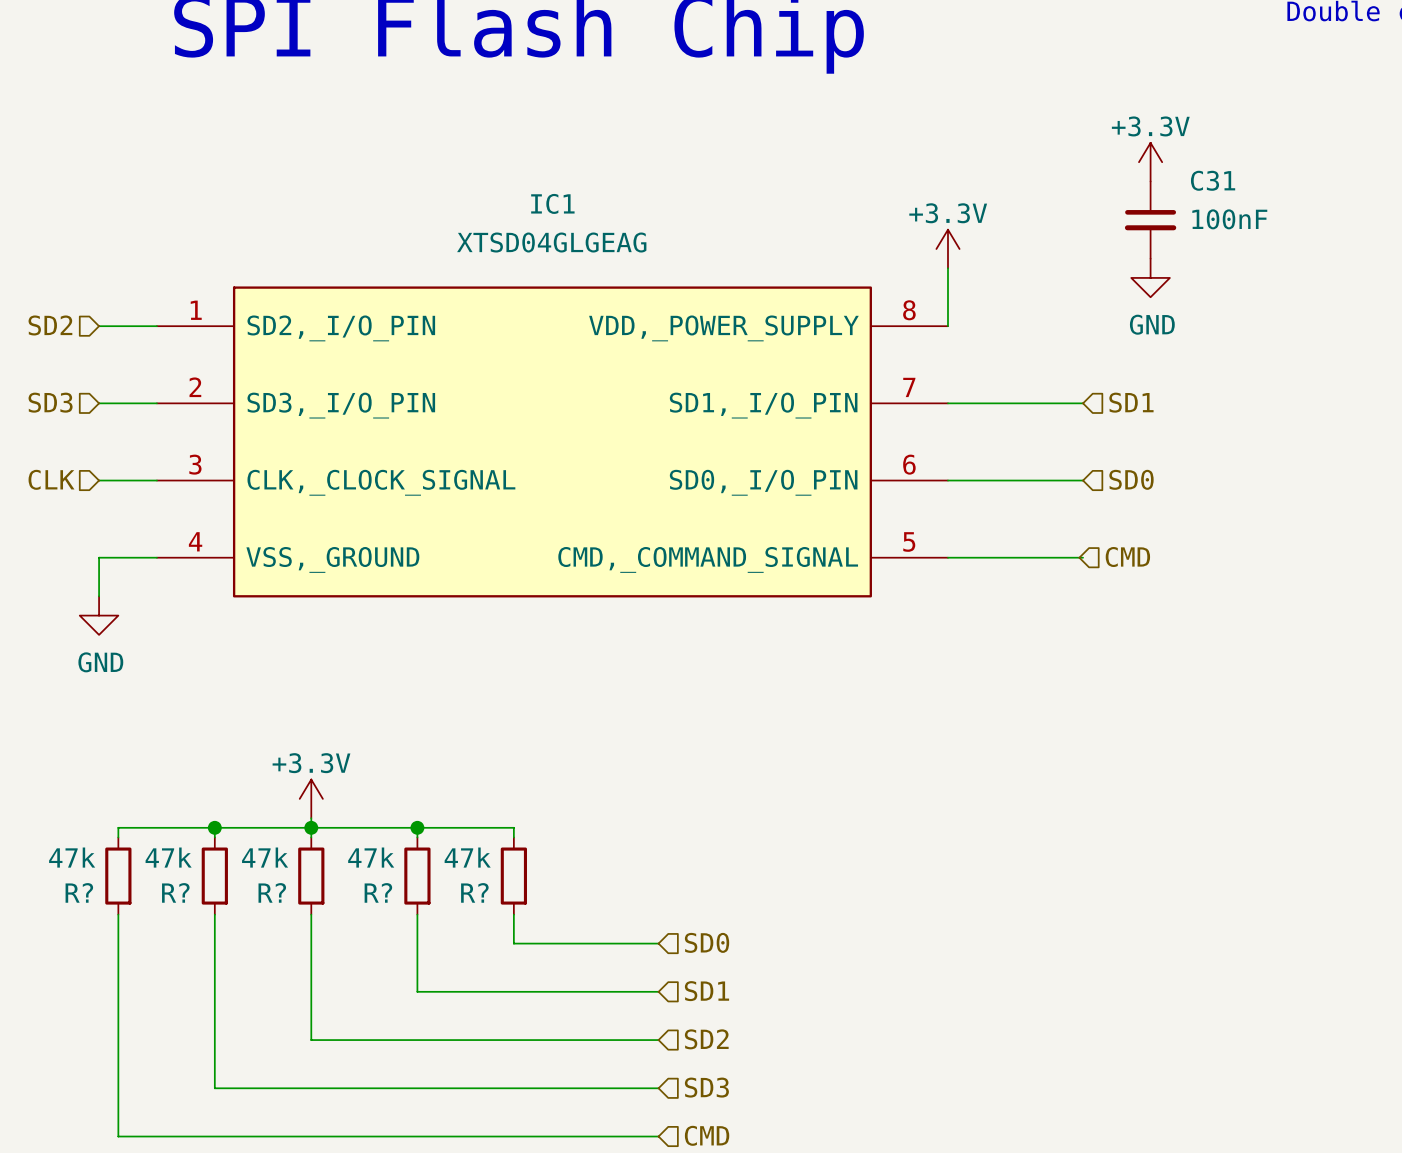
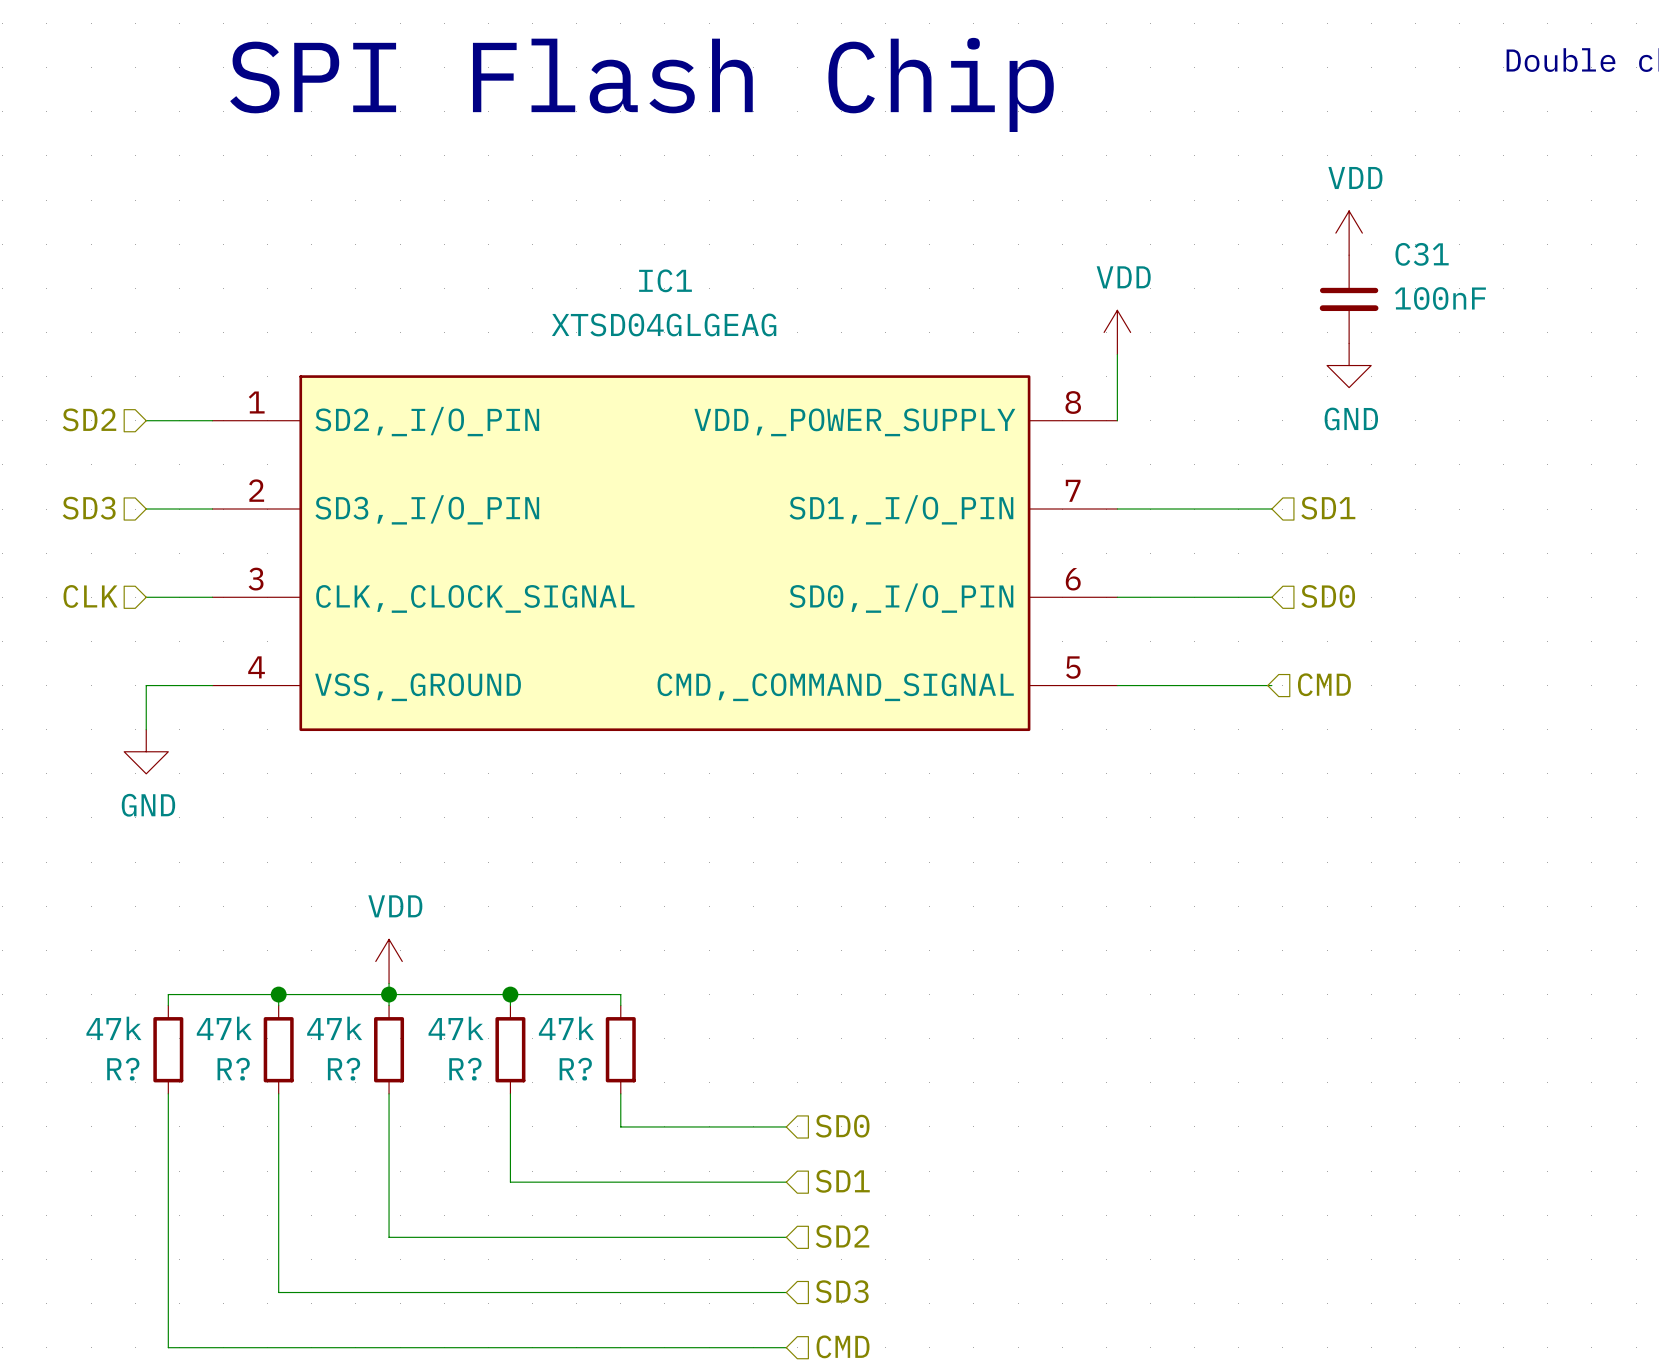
power symbol: +3.3V (1150, 162) -> VDD (1349, 233)
power symbol: +3.3V (947, 249) -> VDD (1117, 332)
power symbol: +3.3V (311, 798) -> VDD (389, 961)

